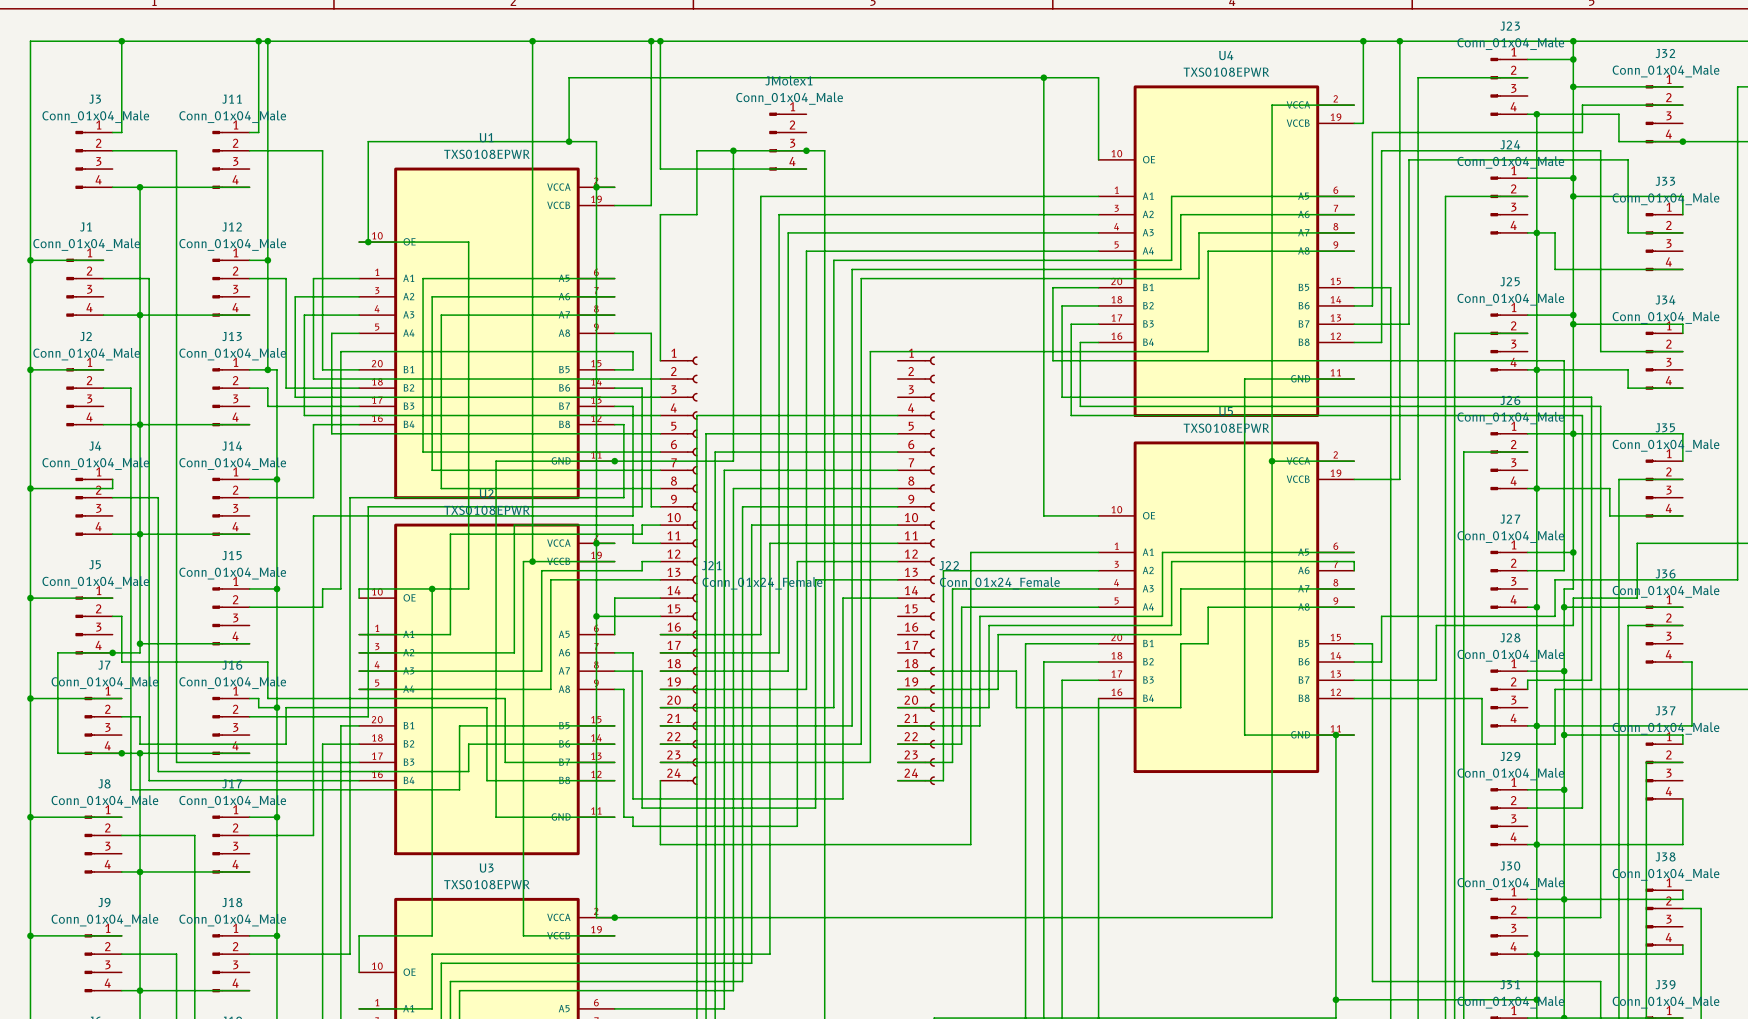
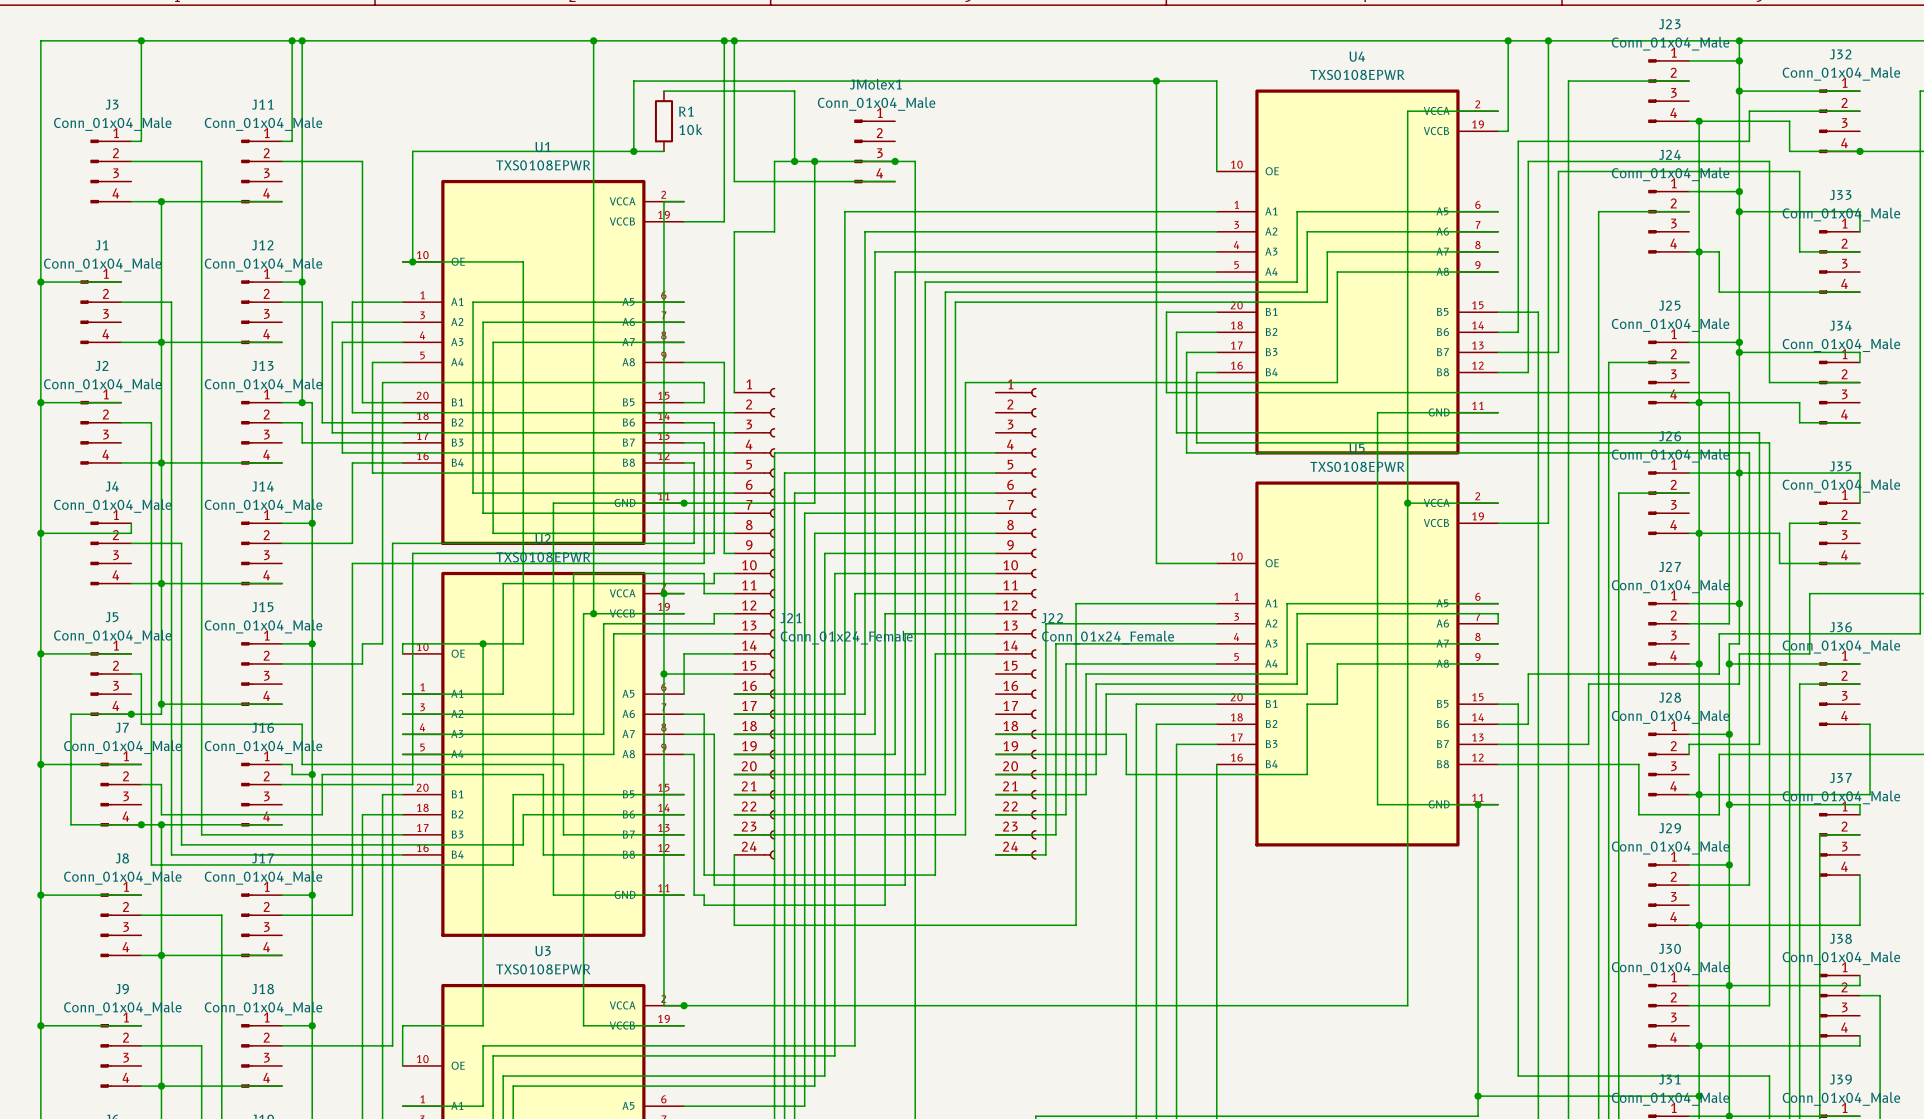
wire: none -> (663, 91) (794, 91) (794, 161)
R1: none -> 10k (663, 121)
wire: (596, 141) (596, 187) -> none
junction: none -> (794, 161)
junction: (596, 187) -> none

